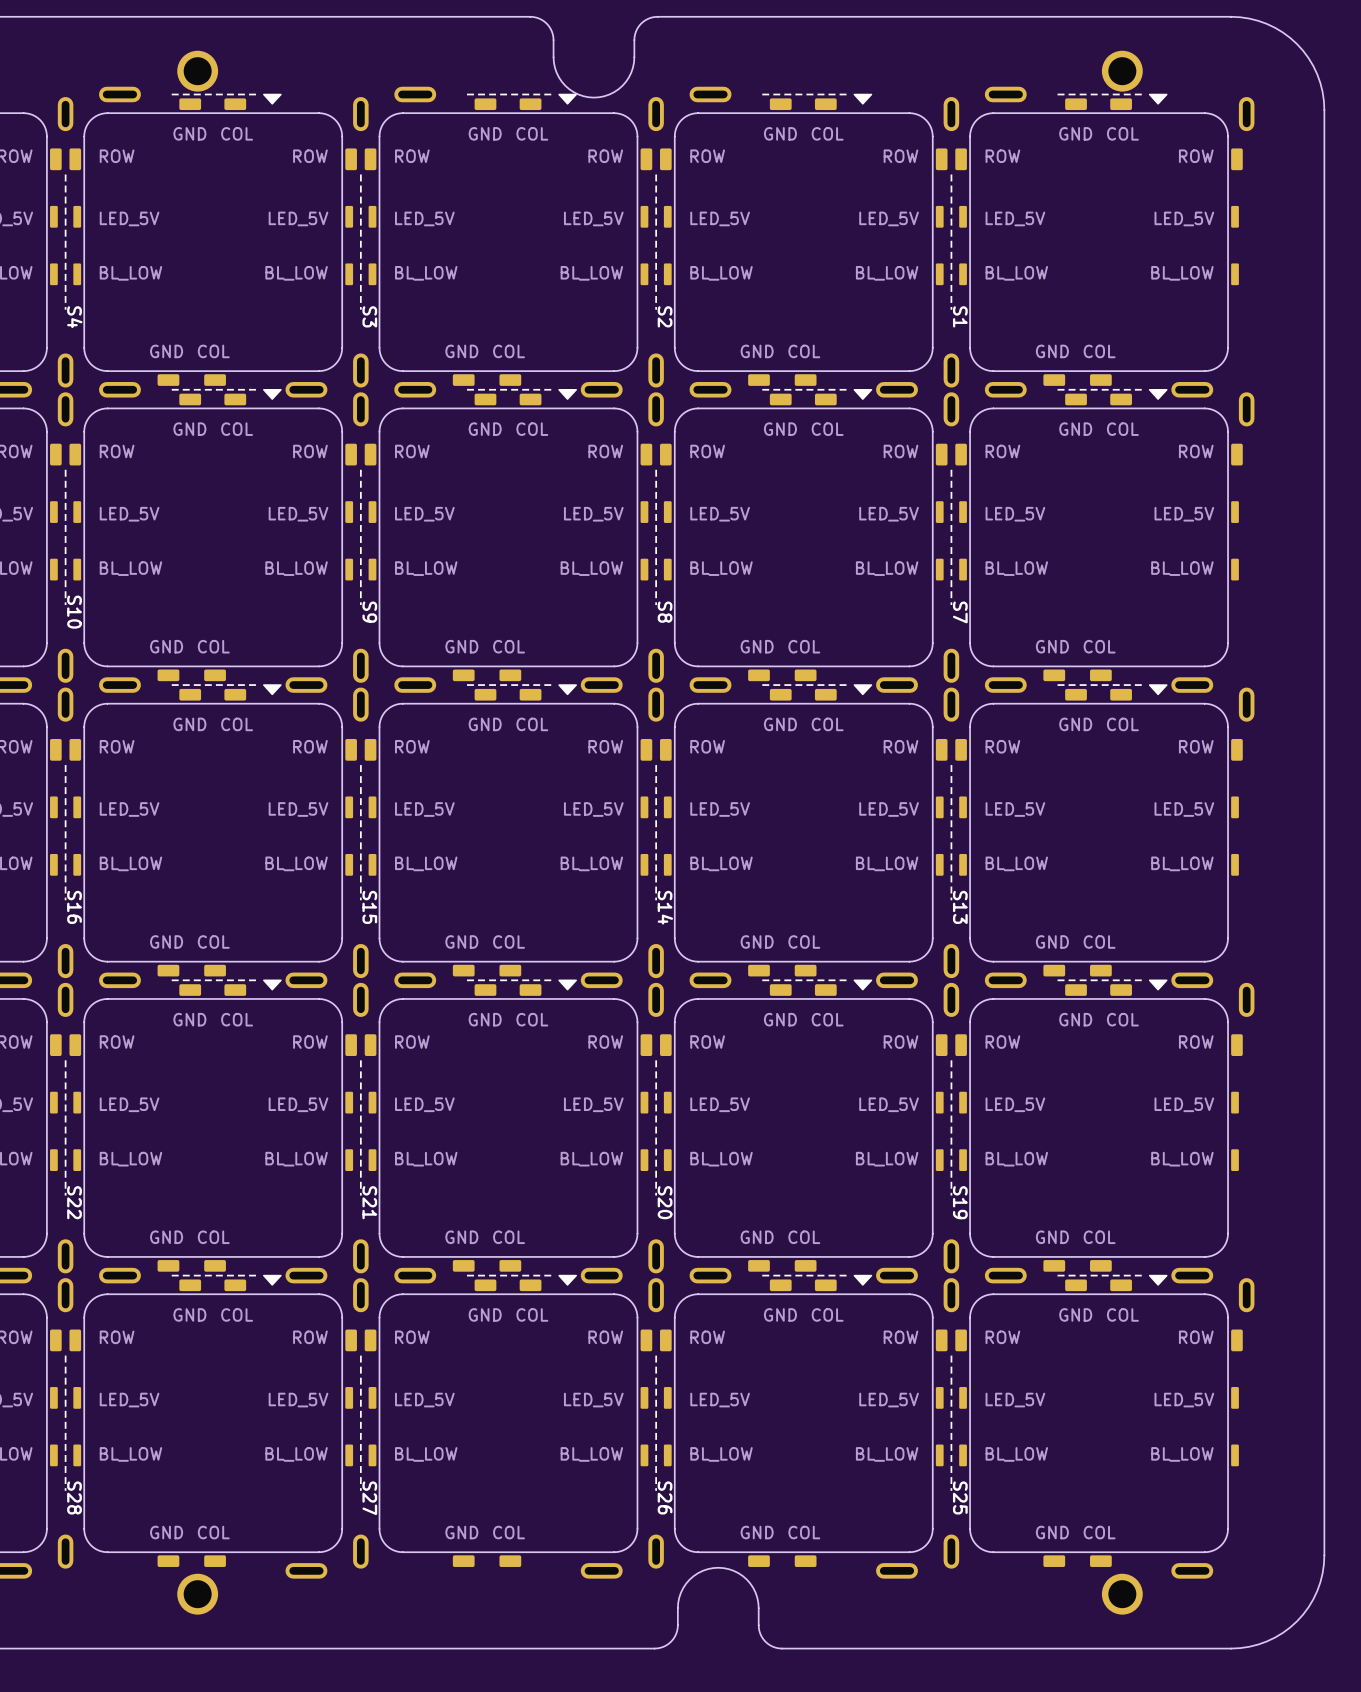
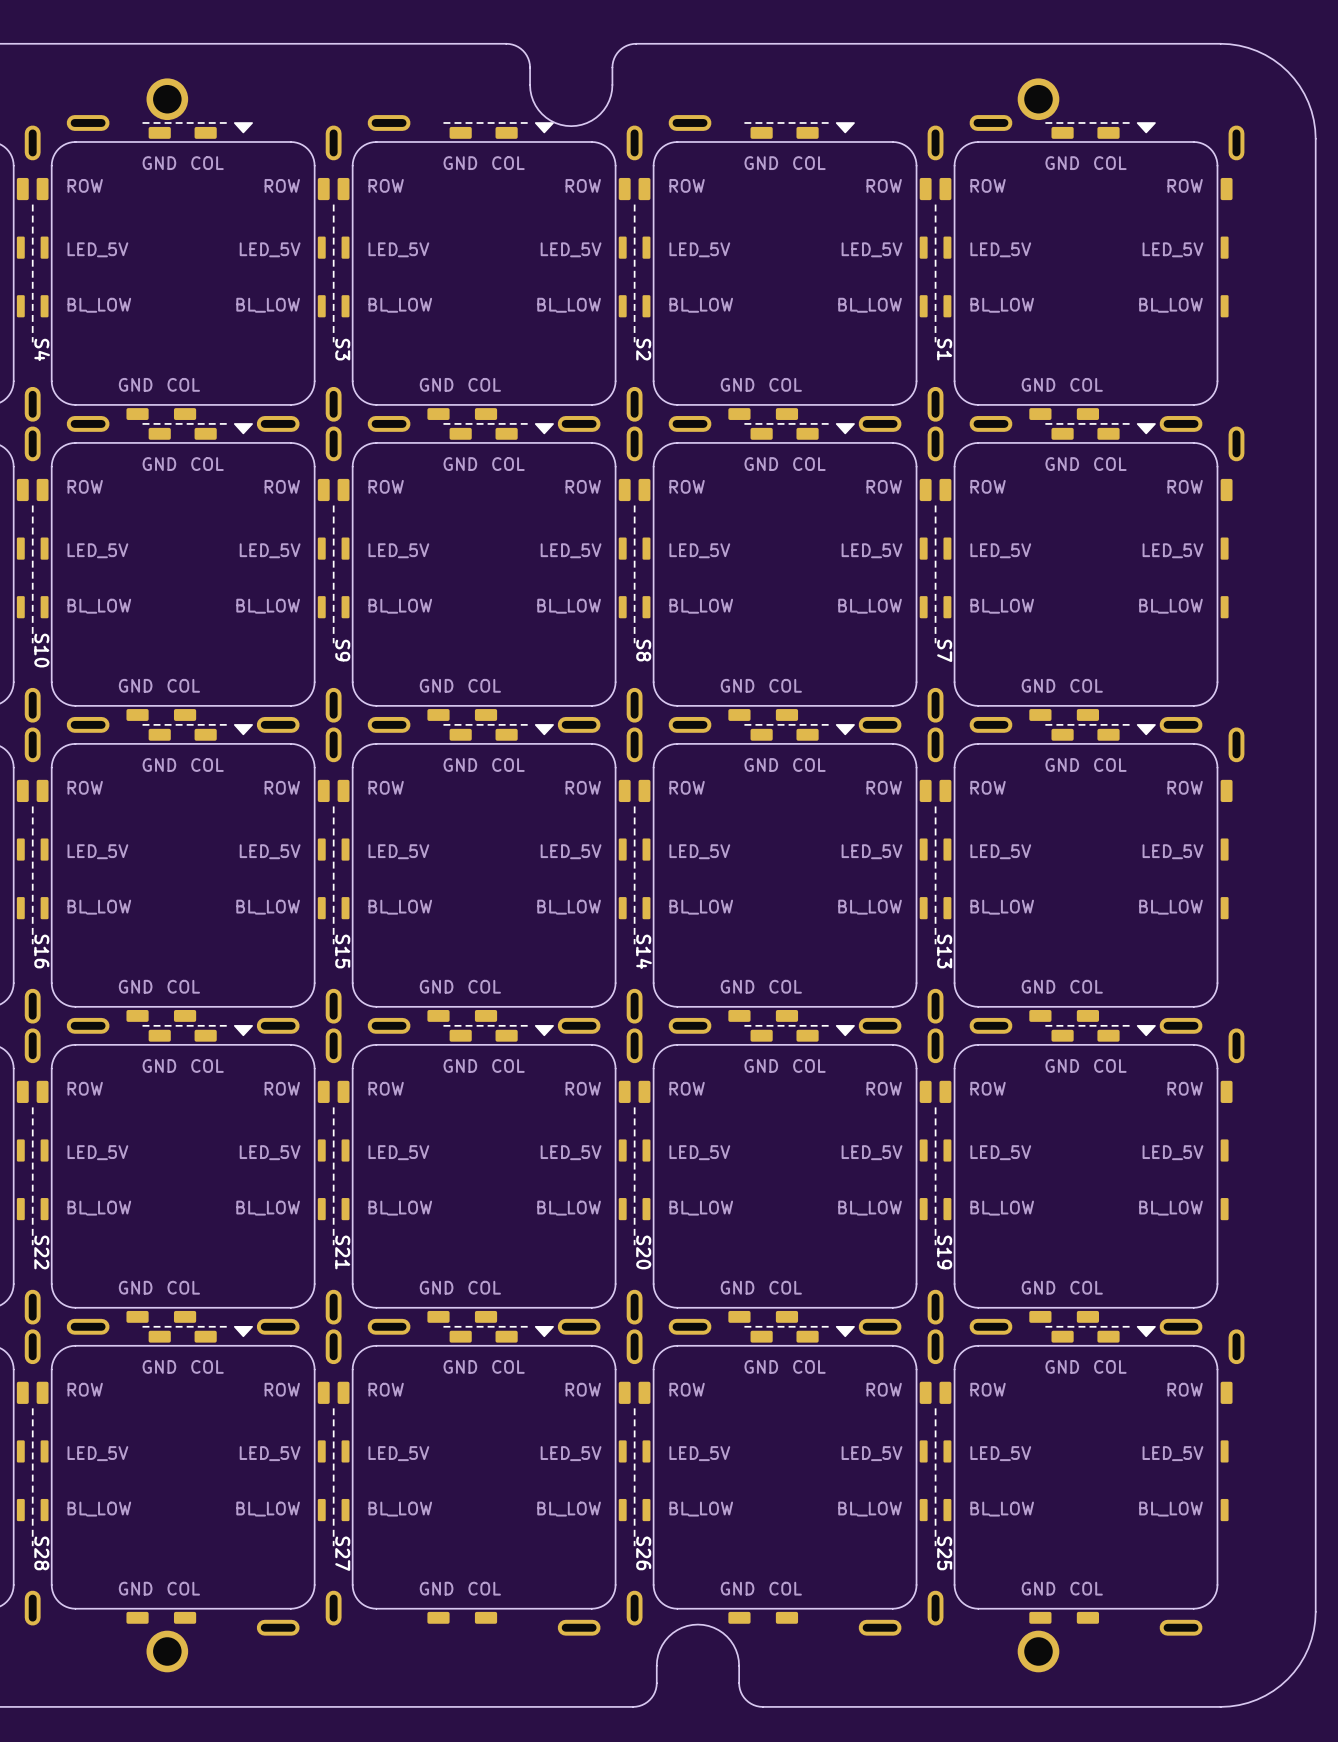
part position: (1122, 71) -> (1038, 99)
part position: (1122, 1594) -> (1038, 1651)

